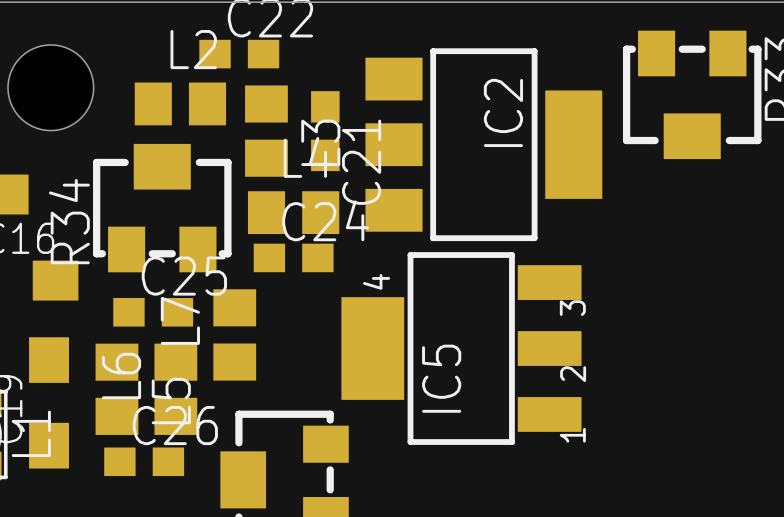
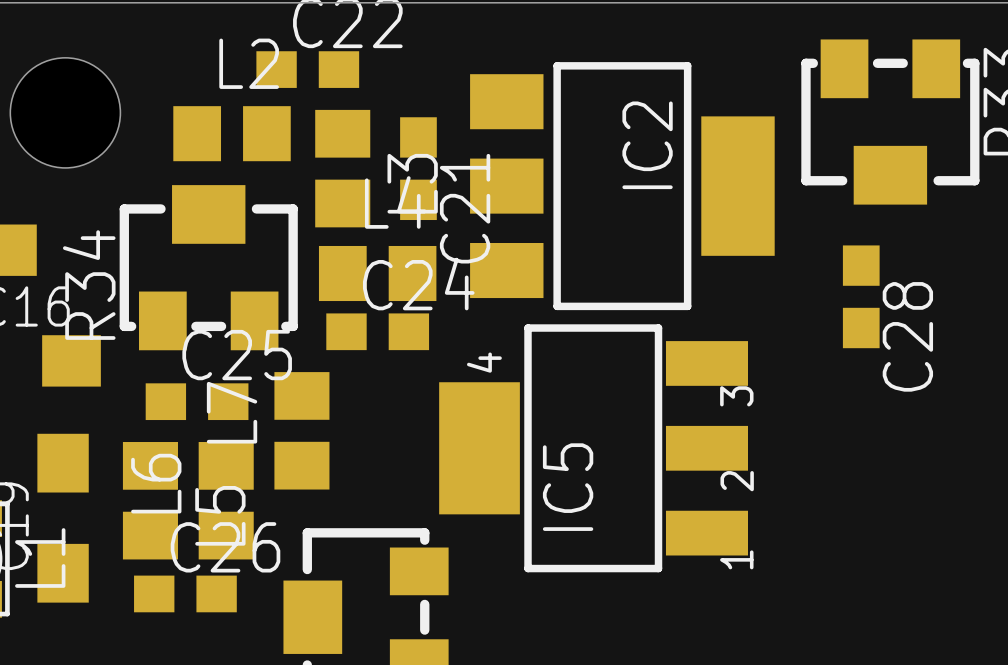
C28: none -> (861, 296)

